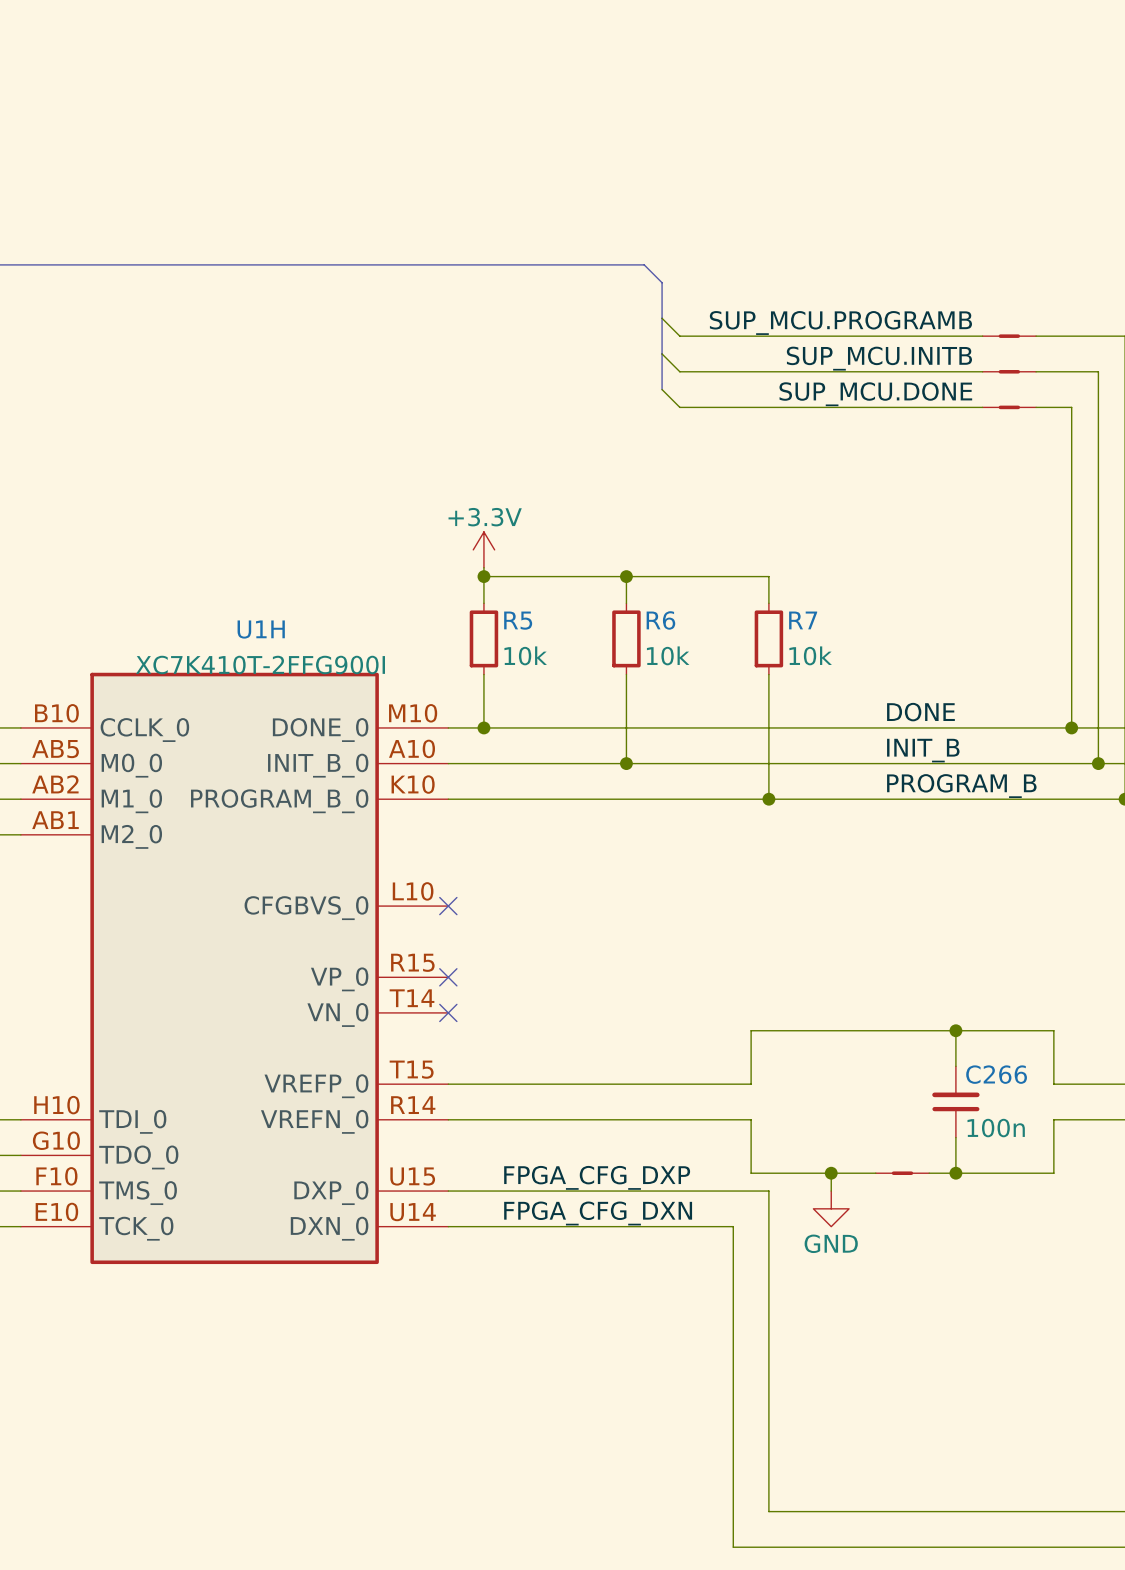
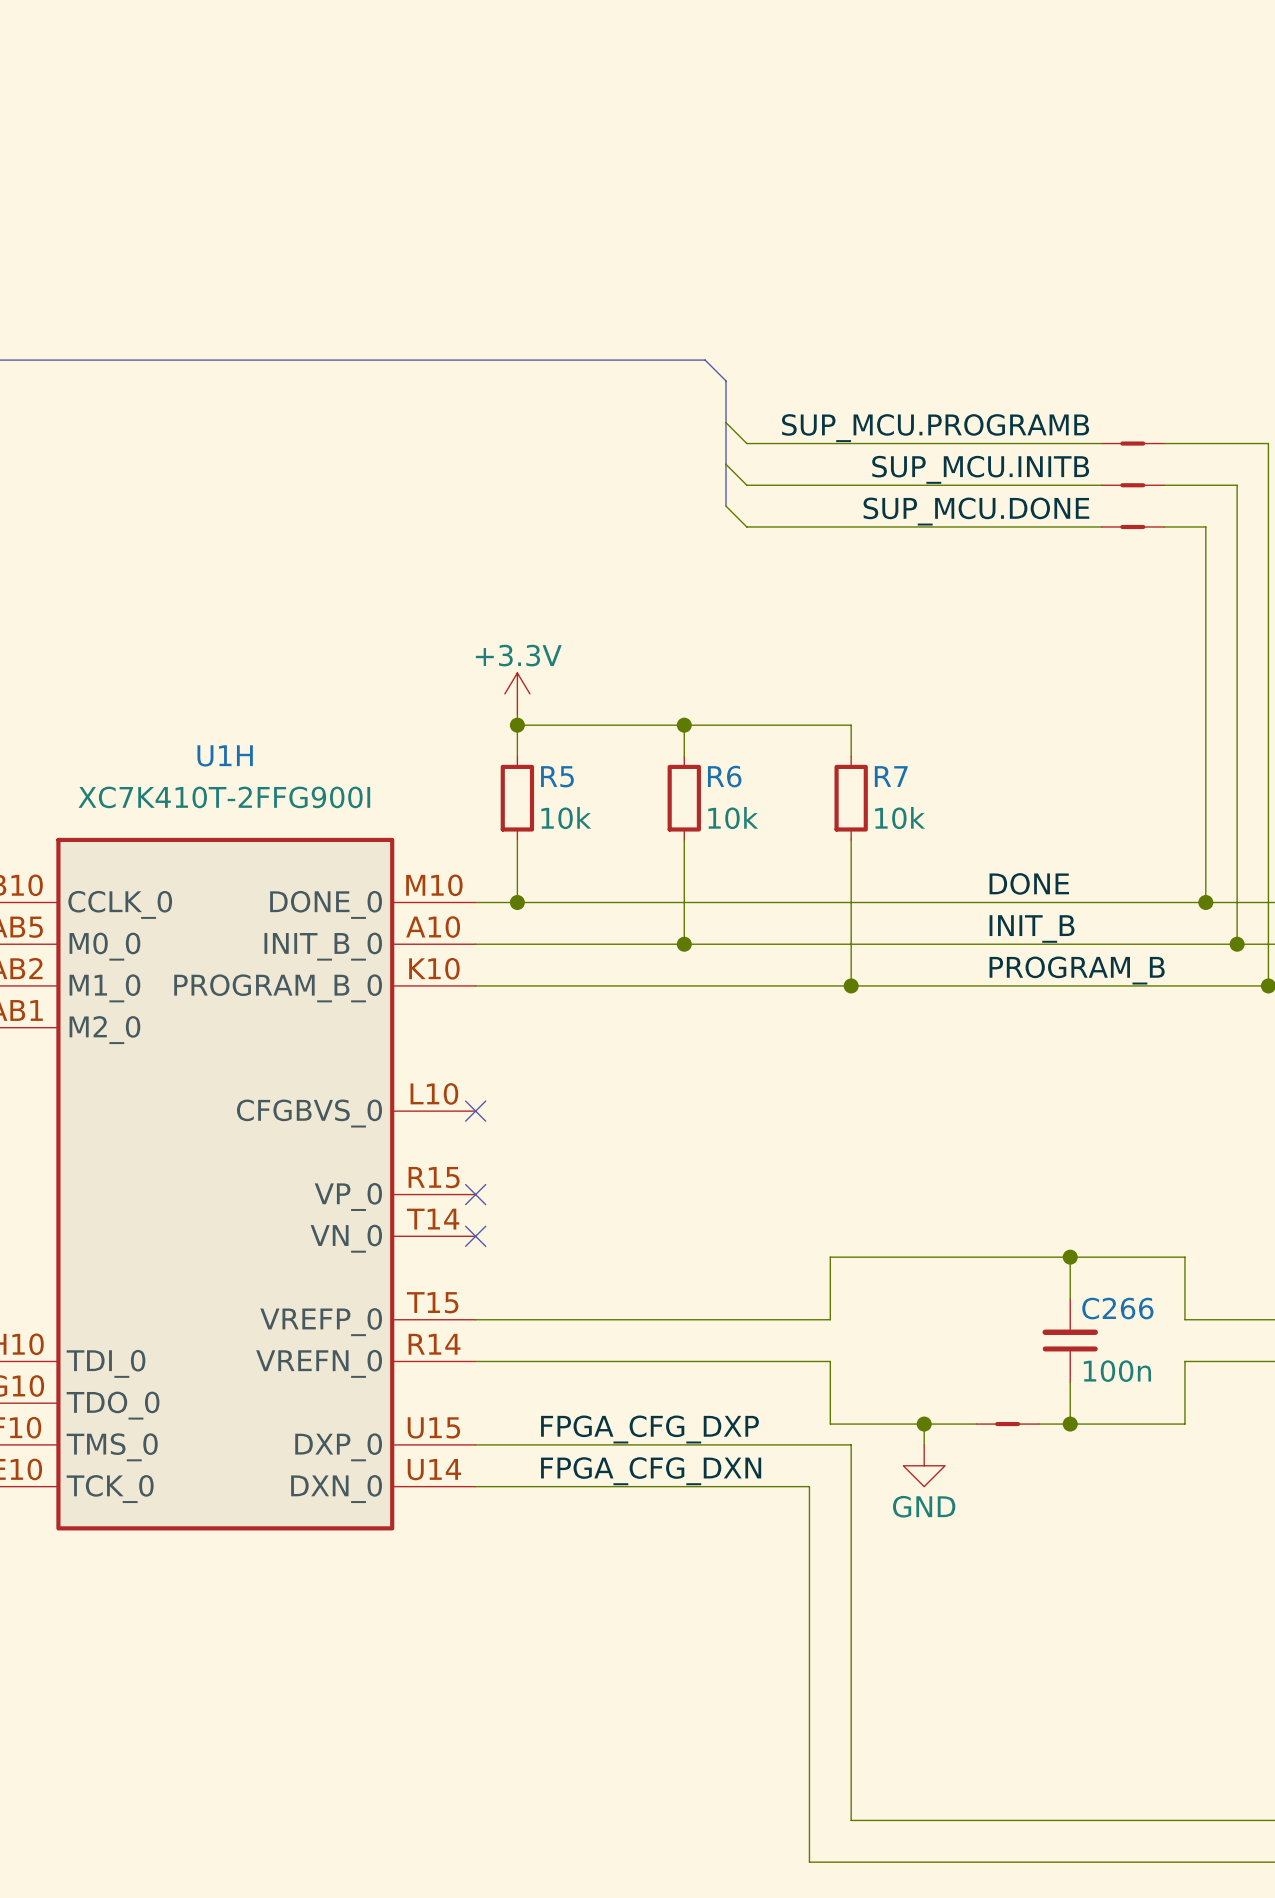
U1H name position: U1H (261, 629) -> U1H (225, 755)
U1H value position: XC7K410T-2FFG900I (260, 664) -> XC7K410T-2FFG900I (224, 797)

